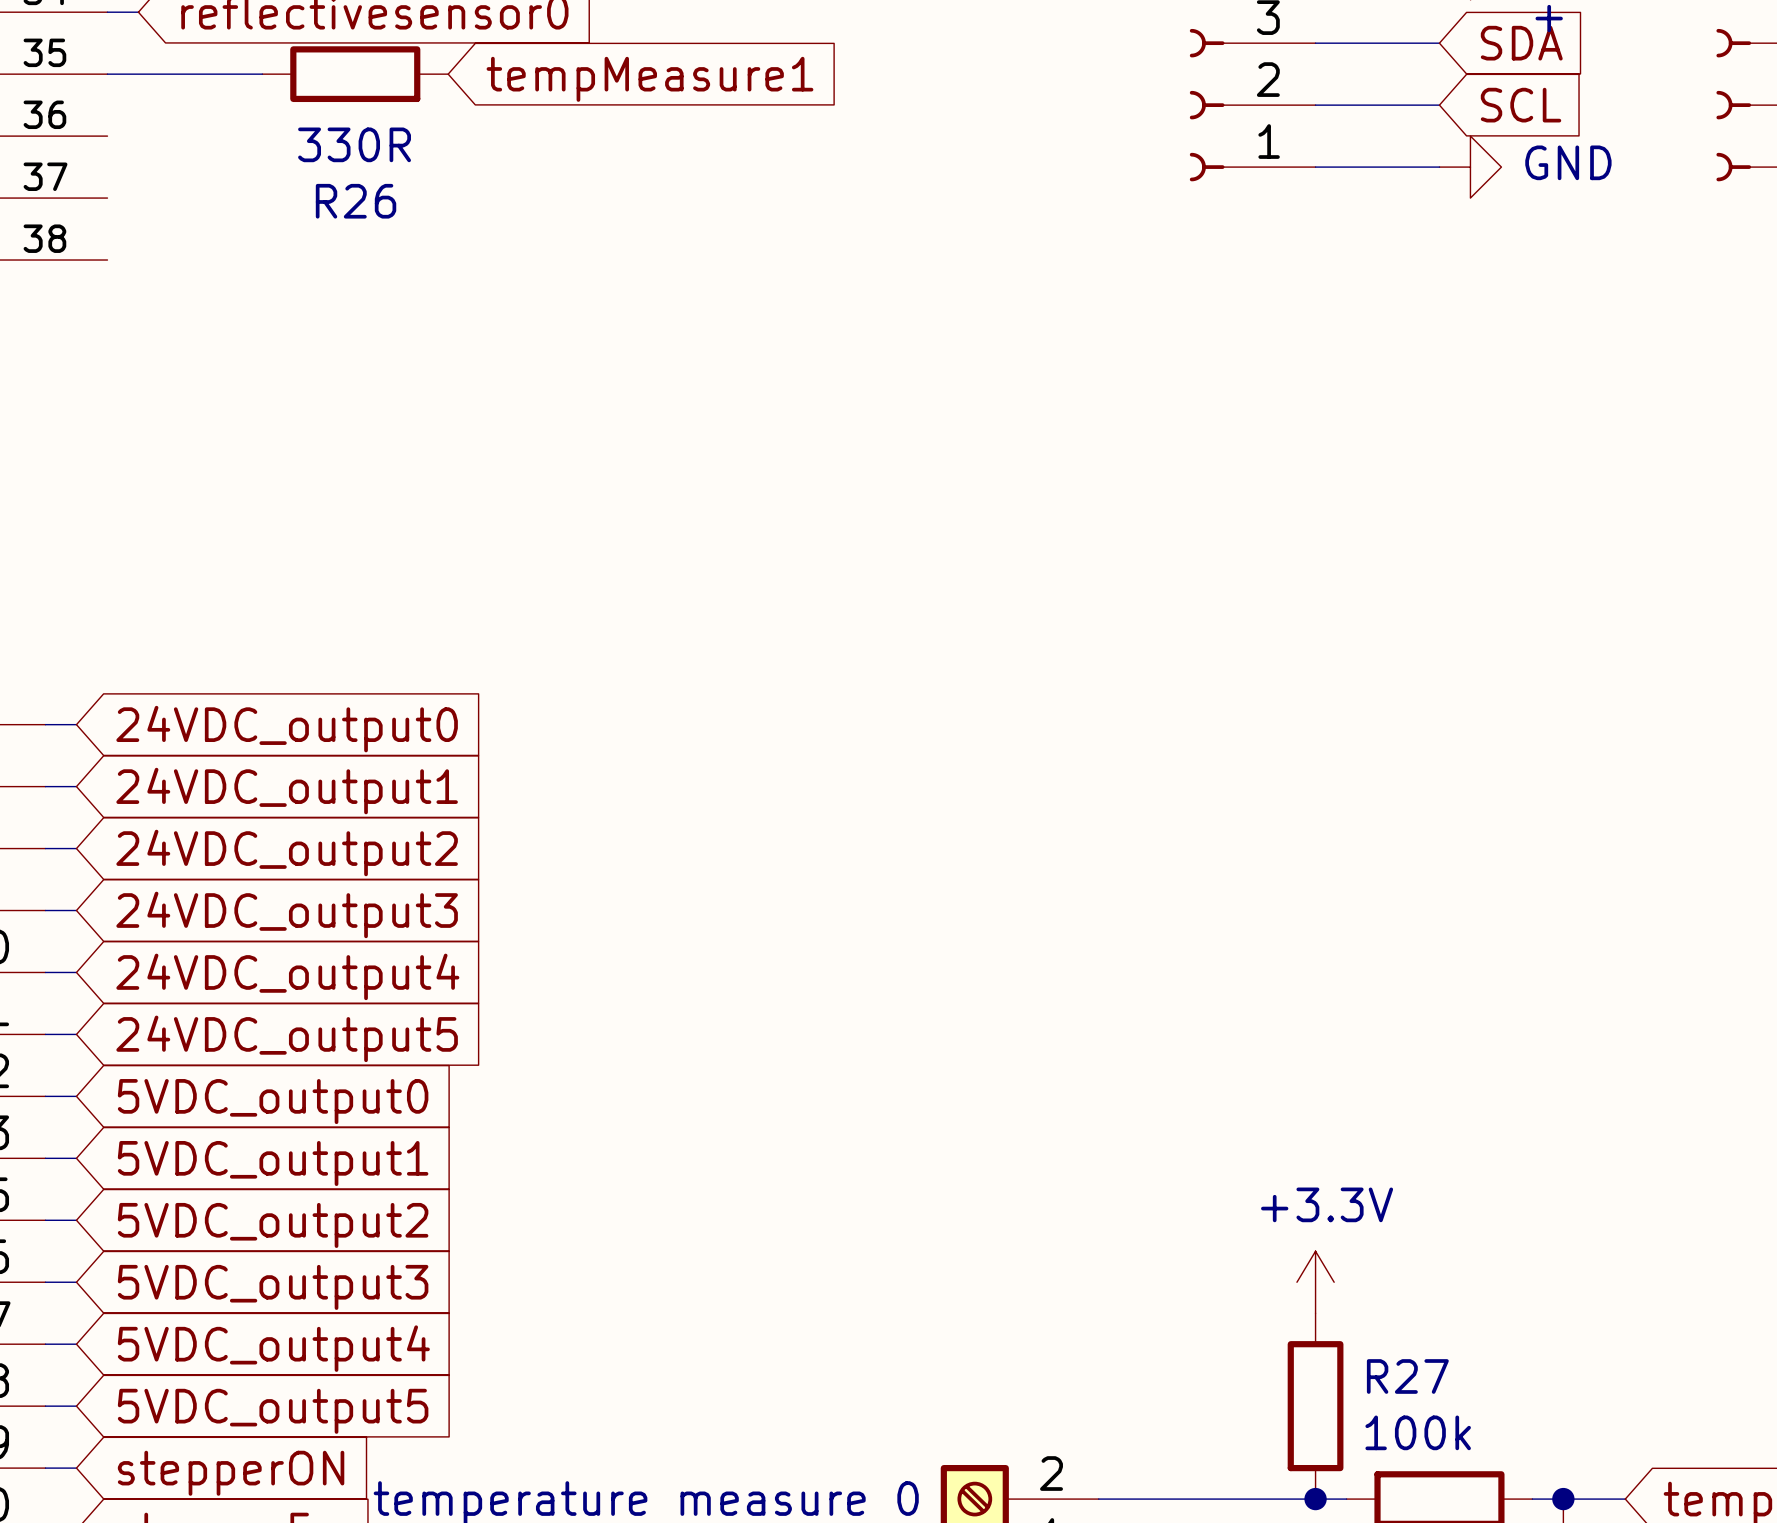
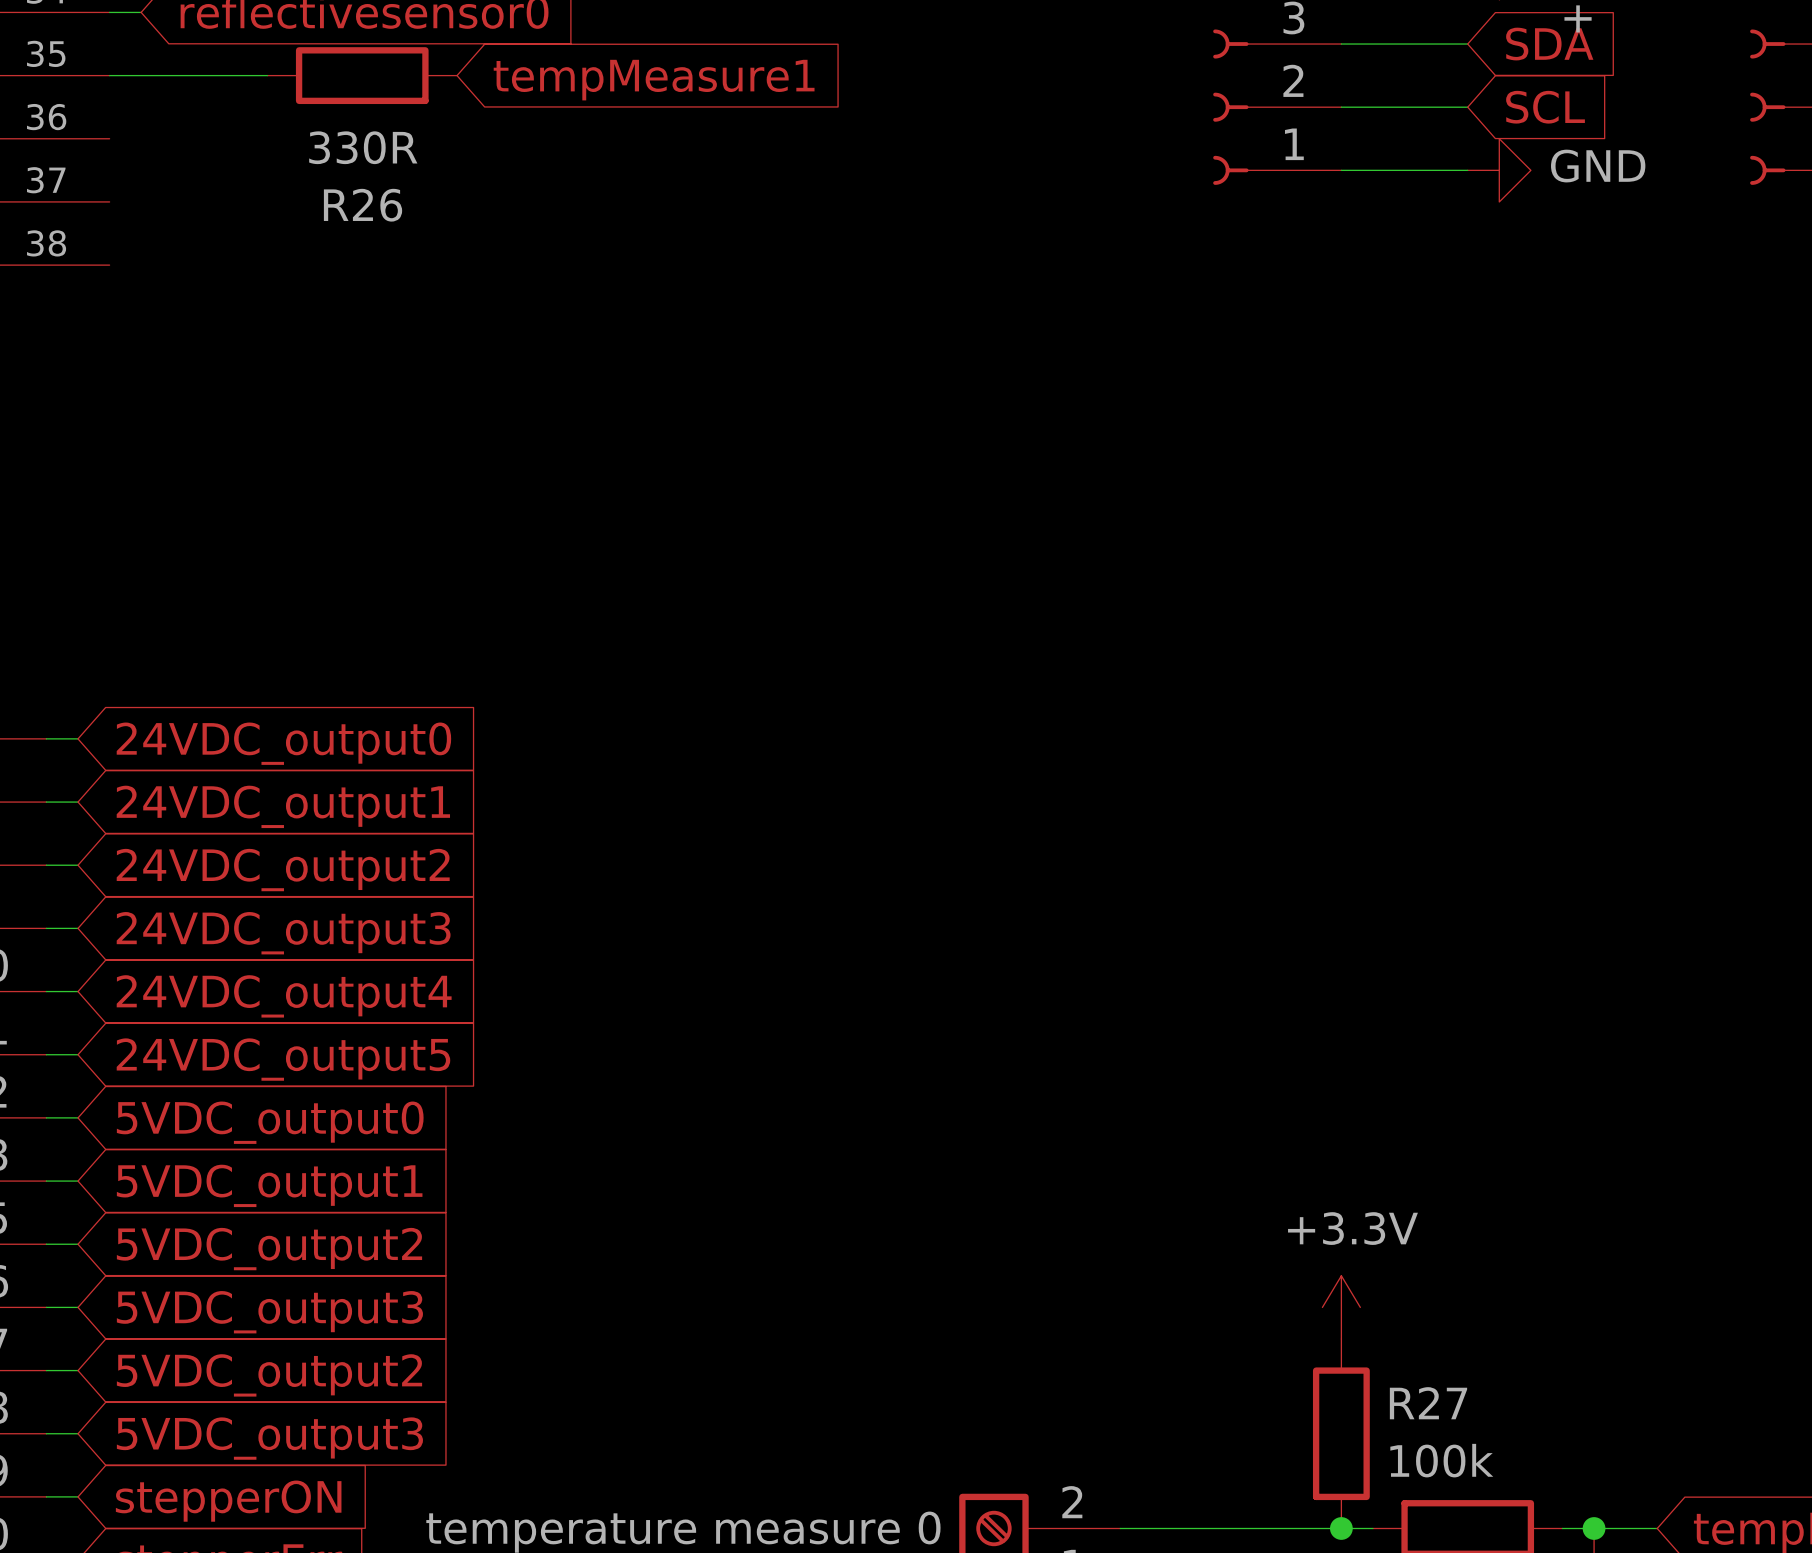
global label: 5VDC_output4 (273, 1348) -> 5VDC_output2 (269, 1375)
global label: 5VDC_output5 (273, 1411) -> 5VDC_output3 (269, 1438)

